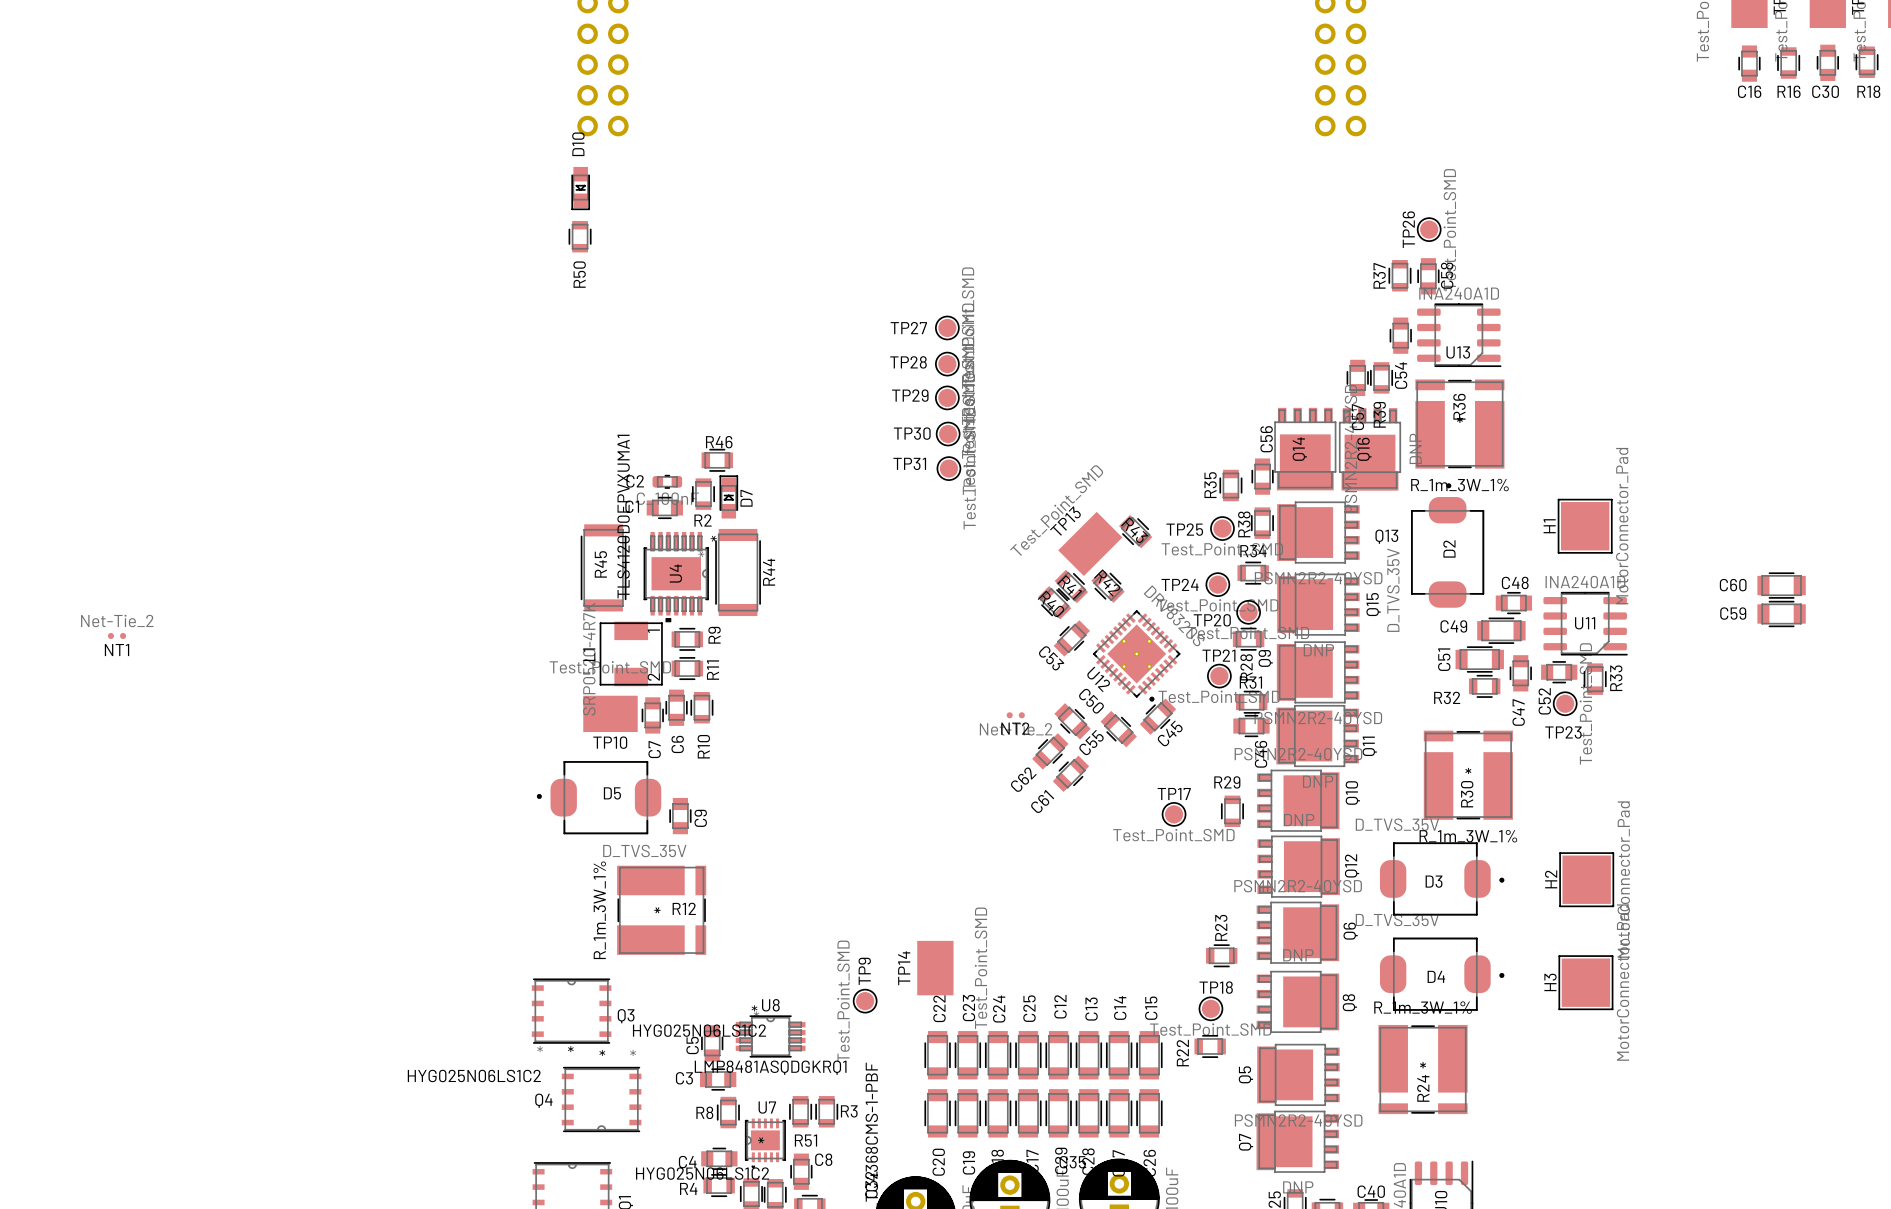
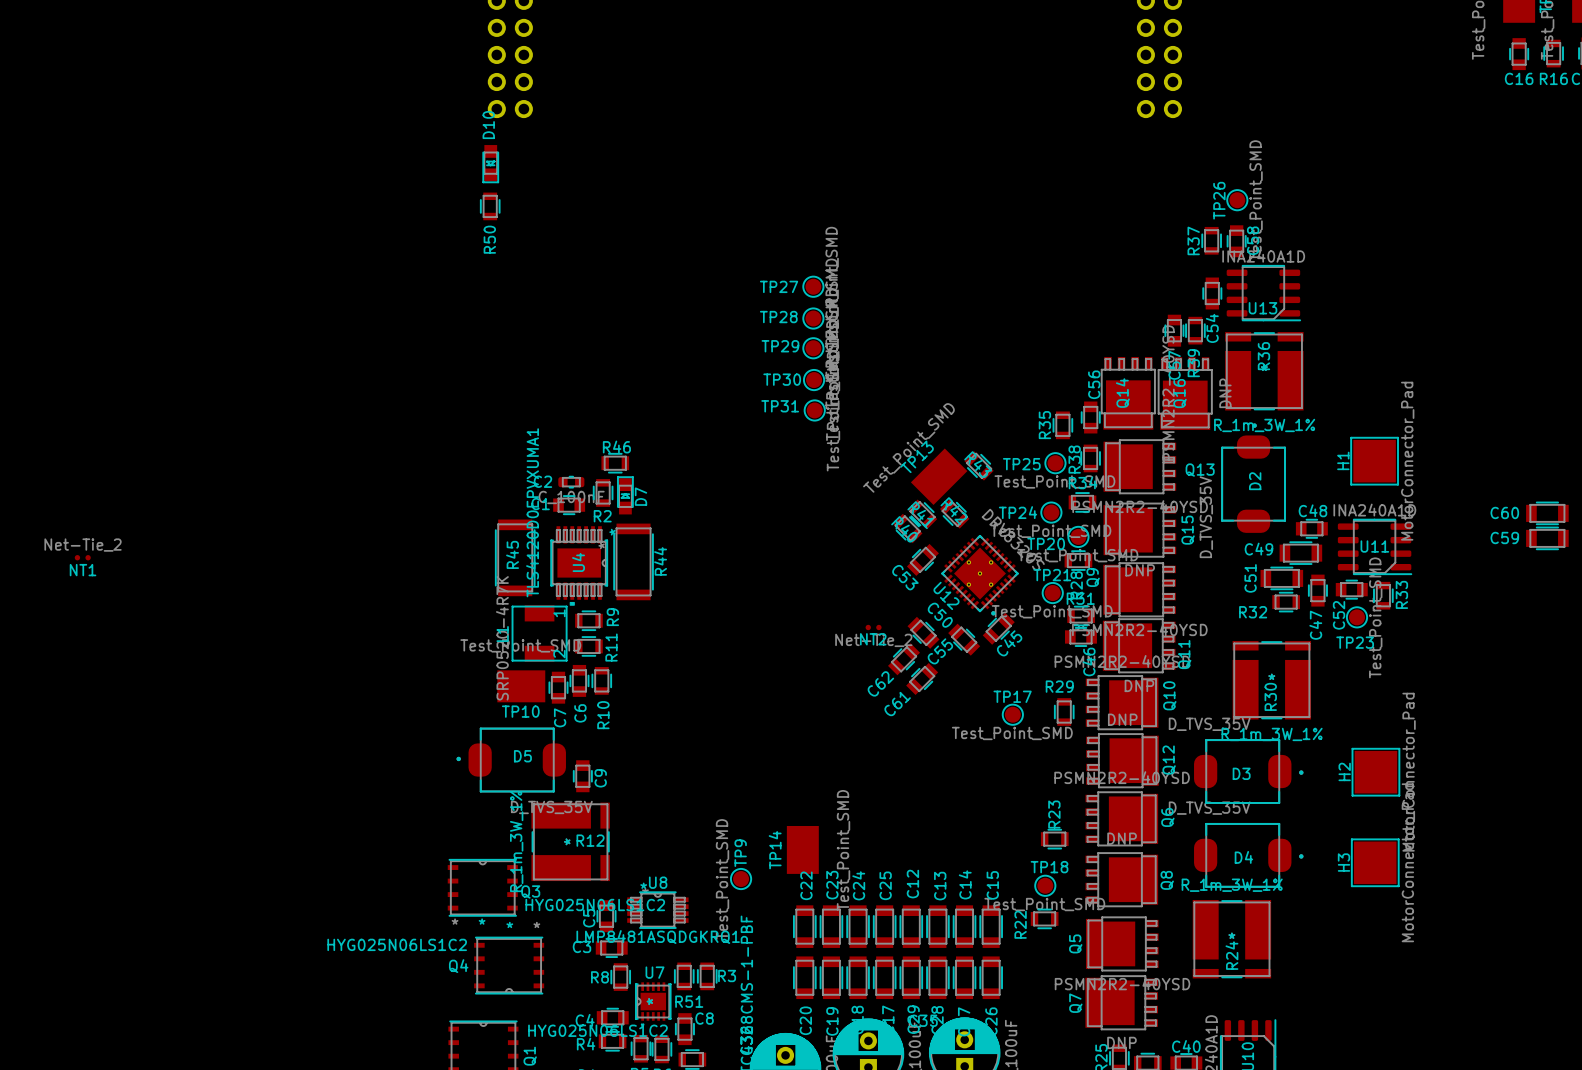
R46 position: (717, 460) -> (615, 463)
C2 position: (667, 481) -> (571, 482)
R2 position: (703, 494) -> (603, 492)
D7 position: (728, 496) -> (625, 495)
C1 position: (664, 507) -> (569, 505)
R45 position: (603, 567) -> (515, 557)
R44 position: (738, 572) -> (633, 561)
U4 position: (676, 577) -> (579, 565)
R9 position: (687, 639) -> (588, 620)
L1 position: (631, 653) -> (539, 633)
R11 position: (687, 668) -> (588, 646)
C6 position: (676, 707) -> (579, 680)
R10 position: (701, 707) -> (601, 680)
TP10 position: (610, 713) -> (521, 686)
C7 position: (652, 715) -> (558, 687)
D5 position: (599, 797) -> (511, 760)
C9 position: (680, 816) -> (582, 776)
R12 position: (661, 910) -> (570, 841)

